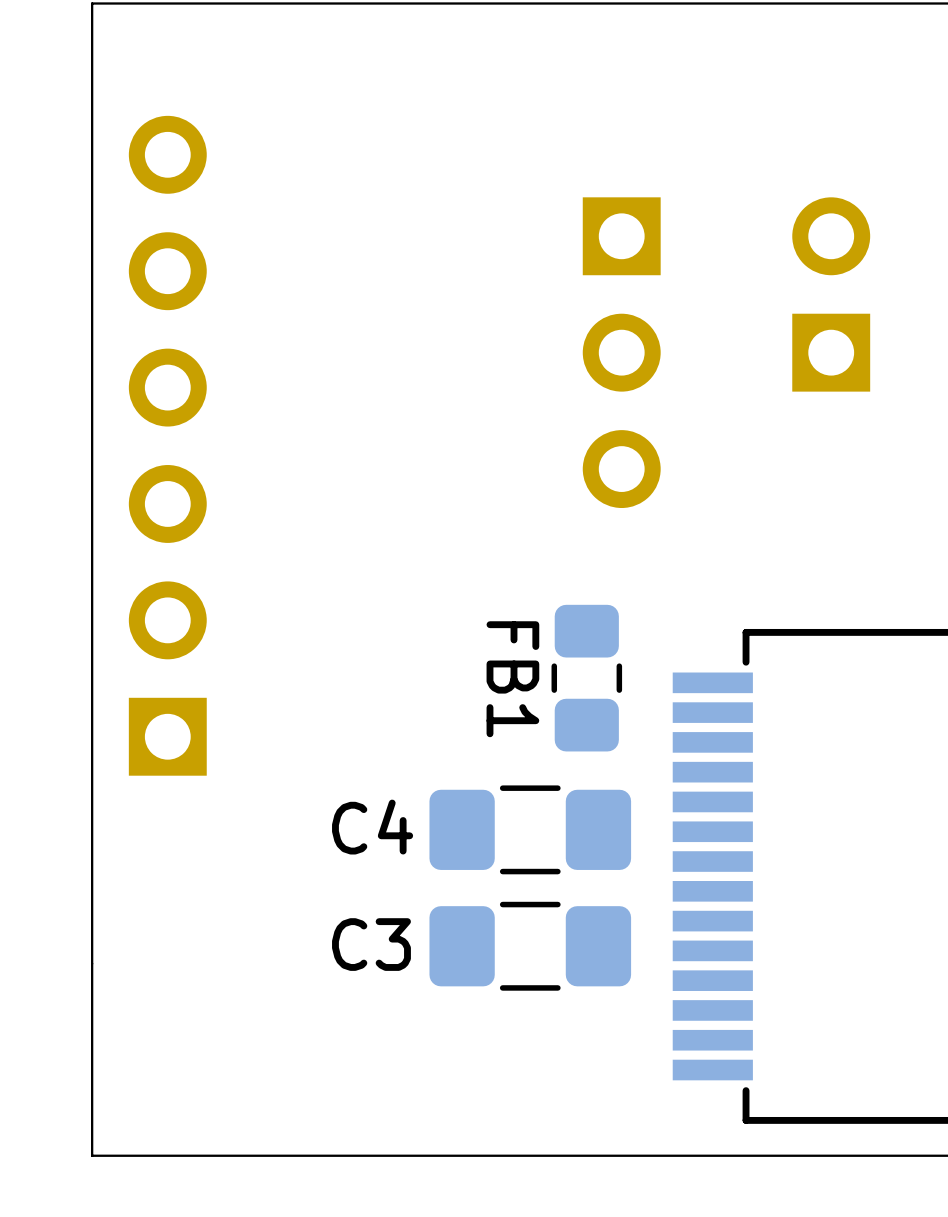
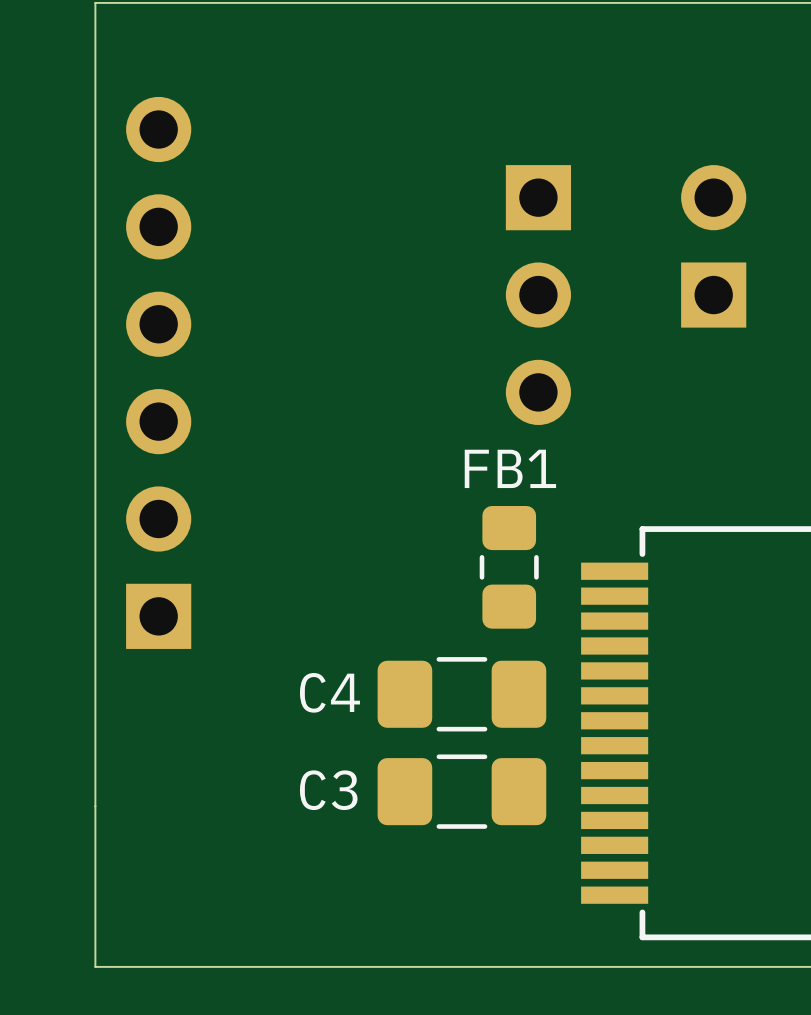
FB1 name rotation: 0° (512, 679) -> 90° counterclockwise (510, 468)

